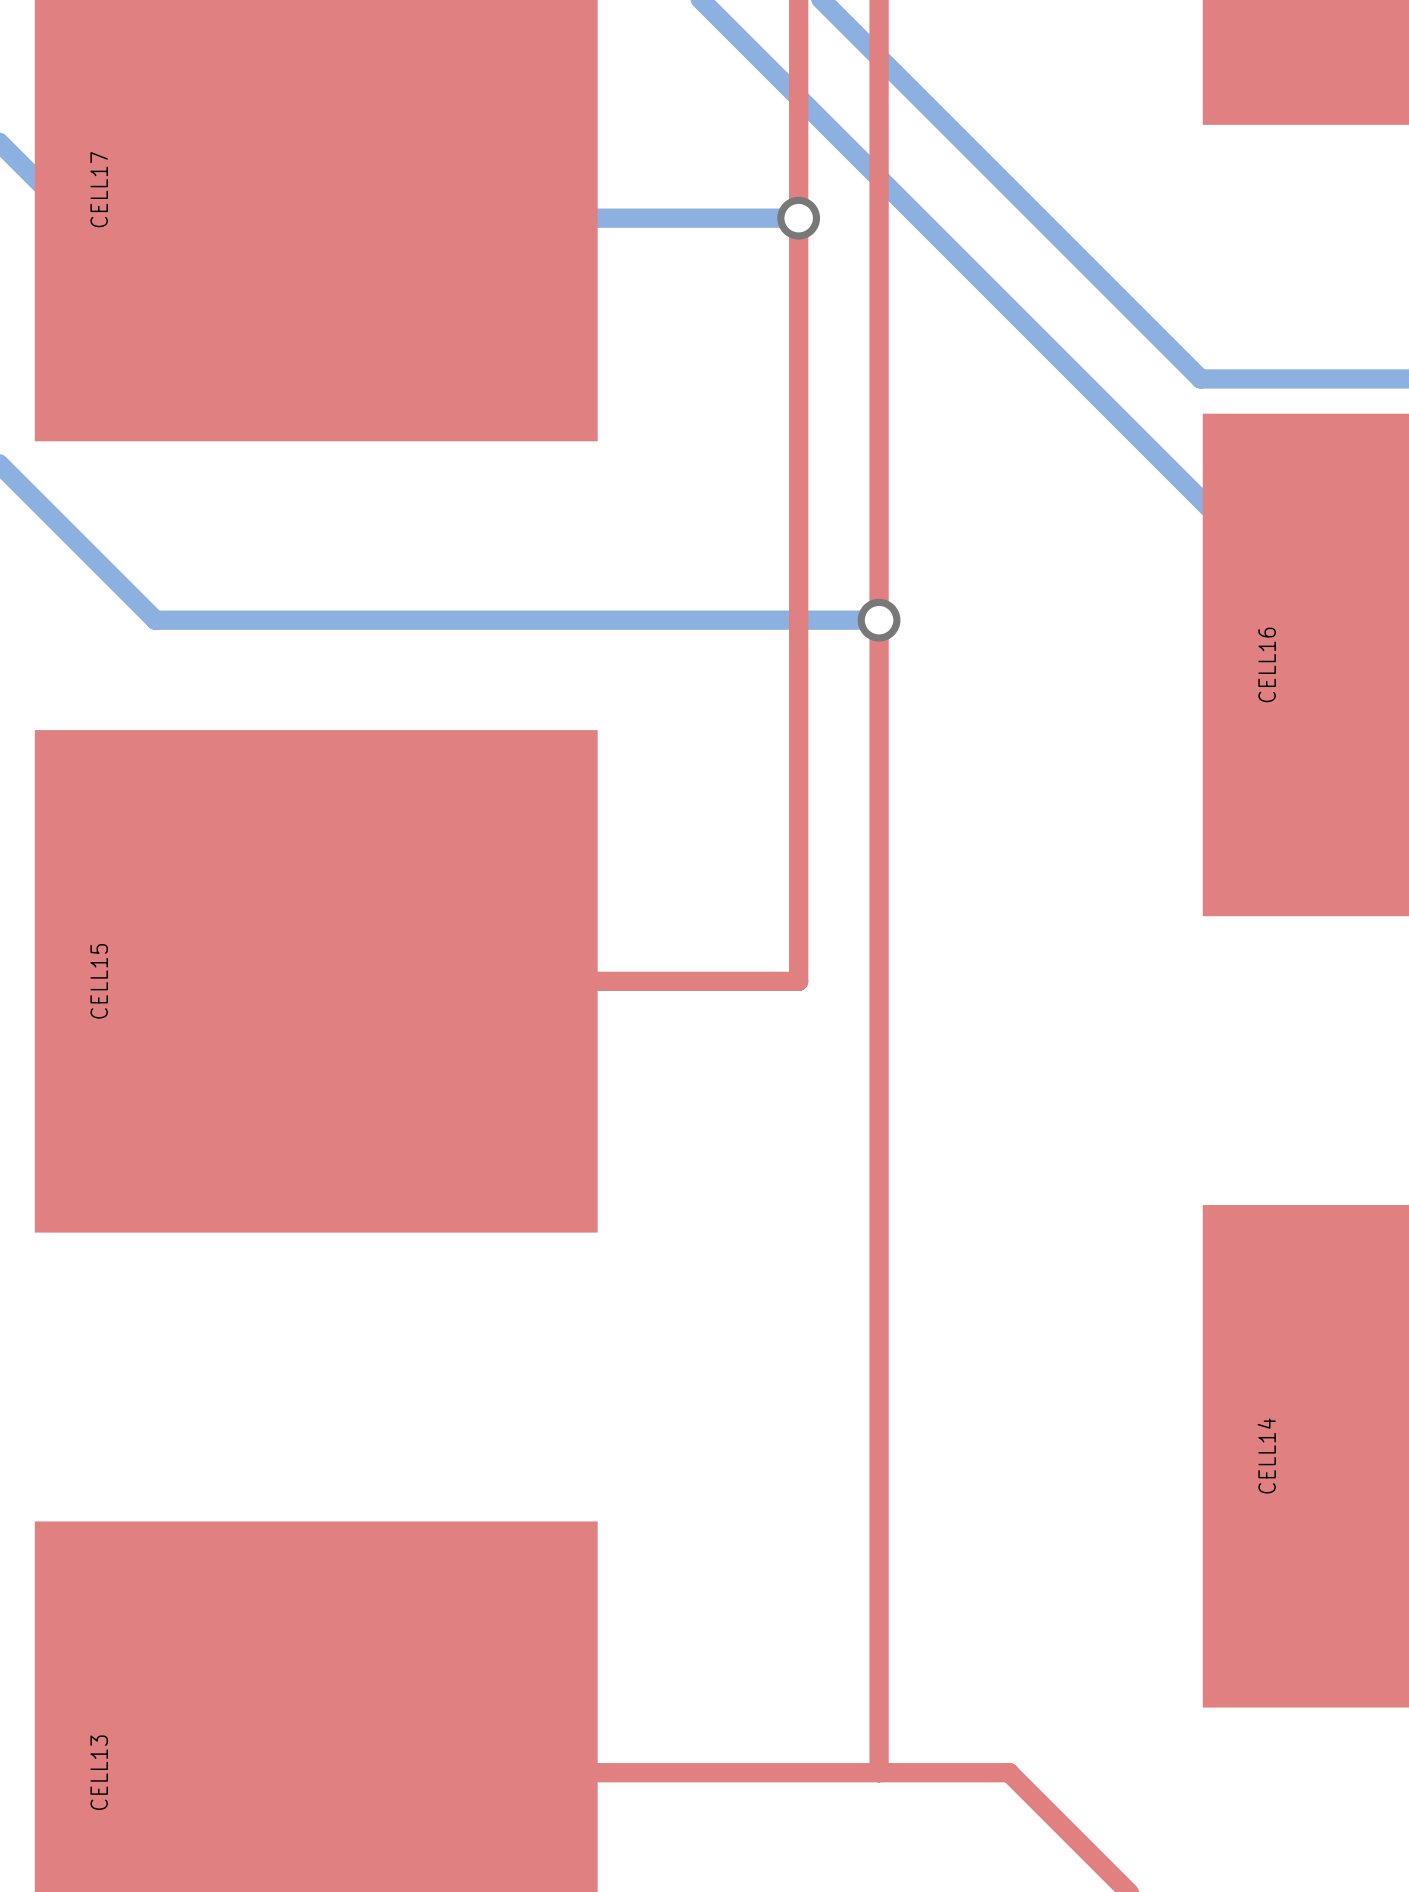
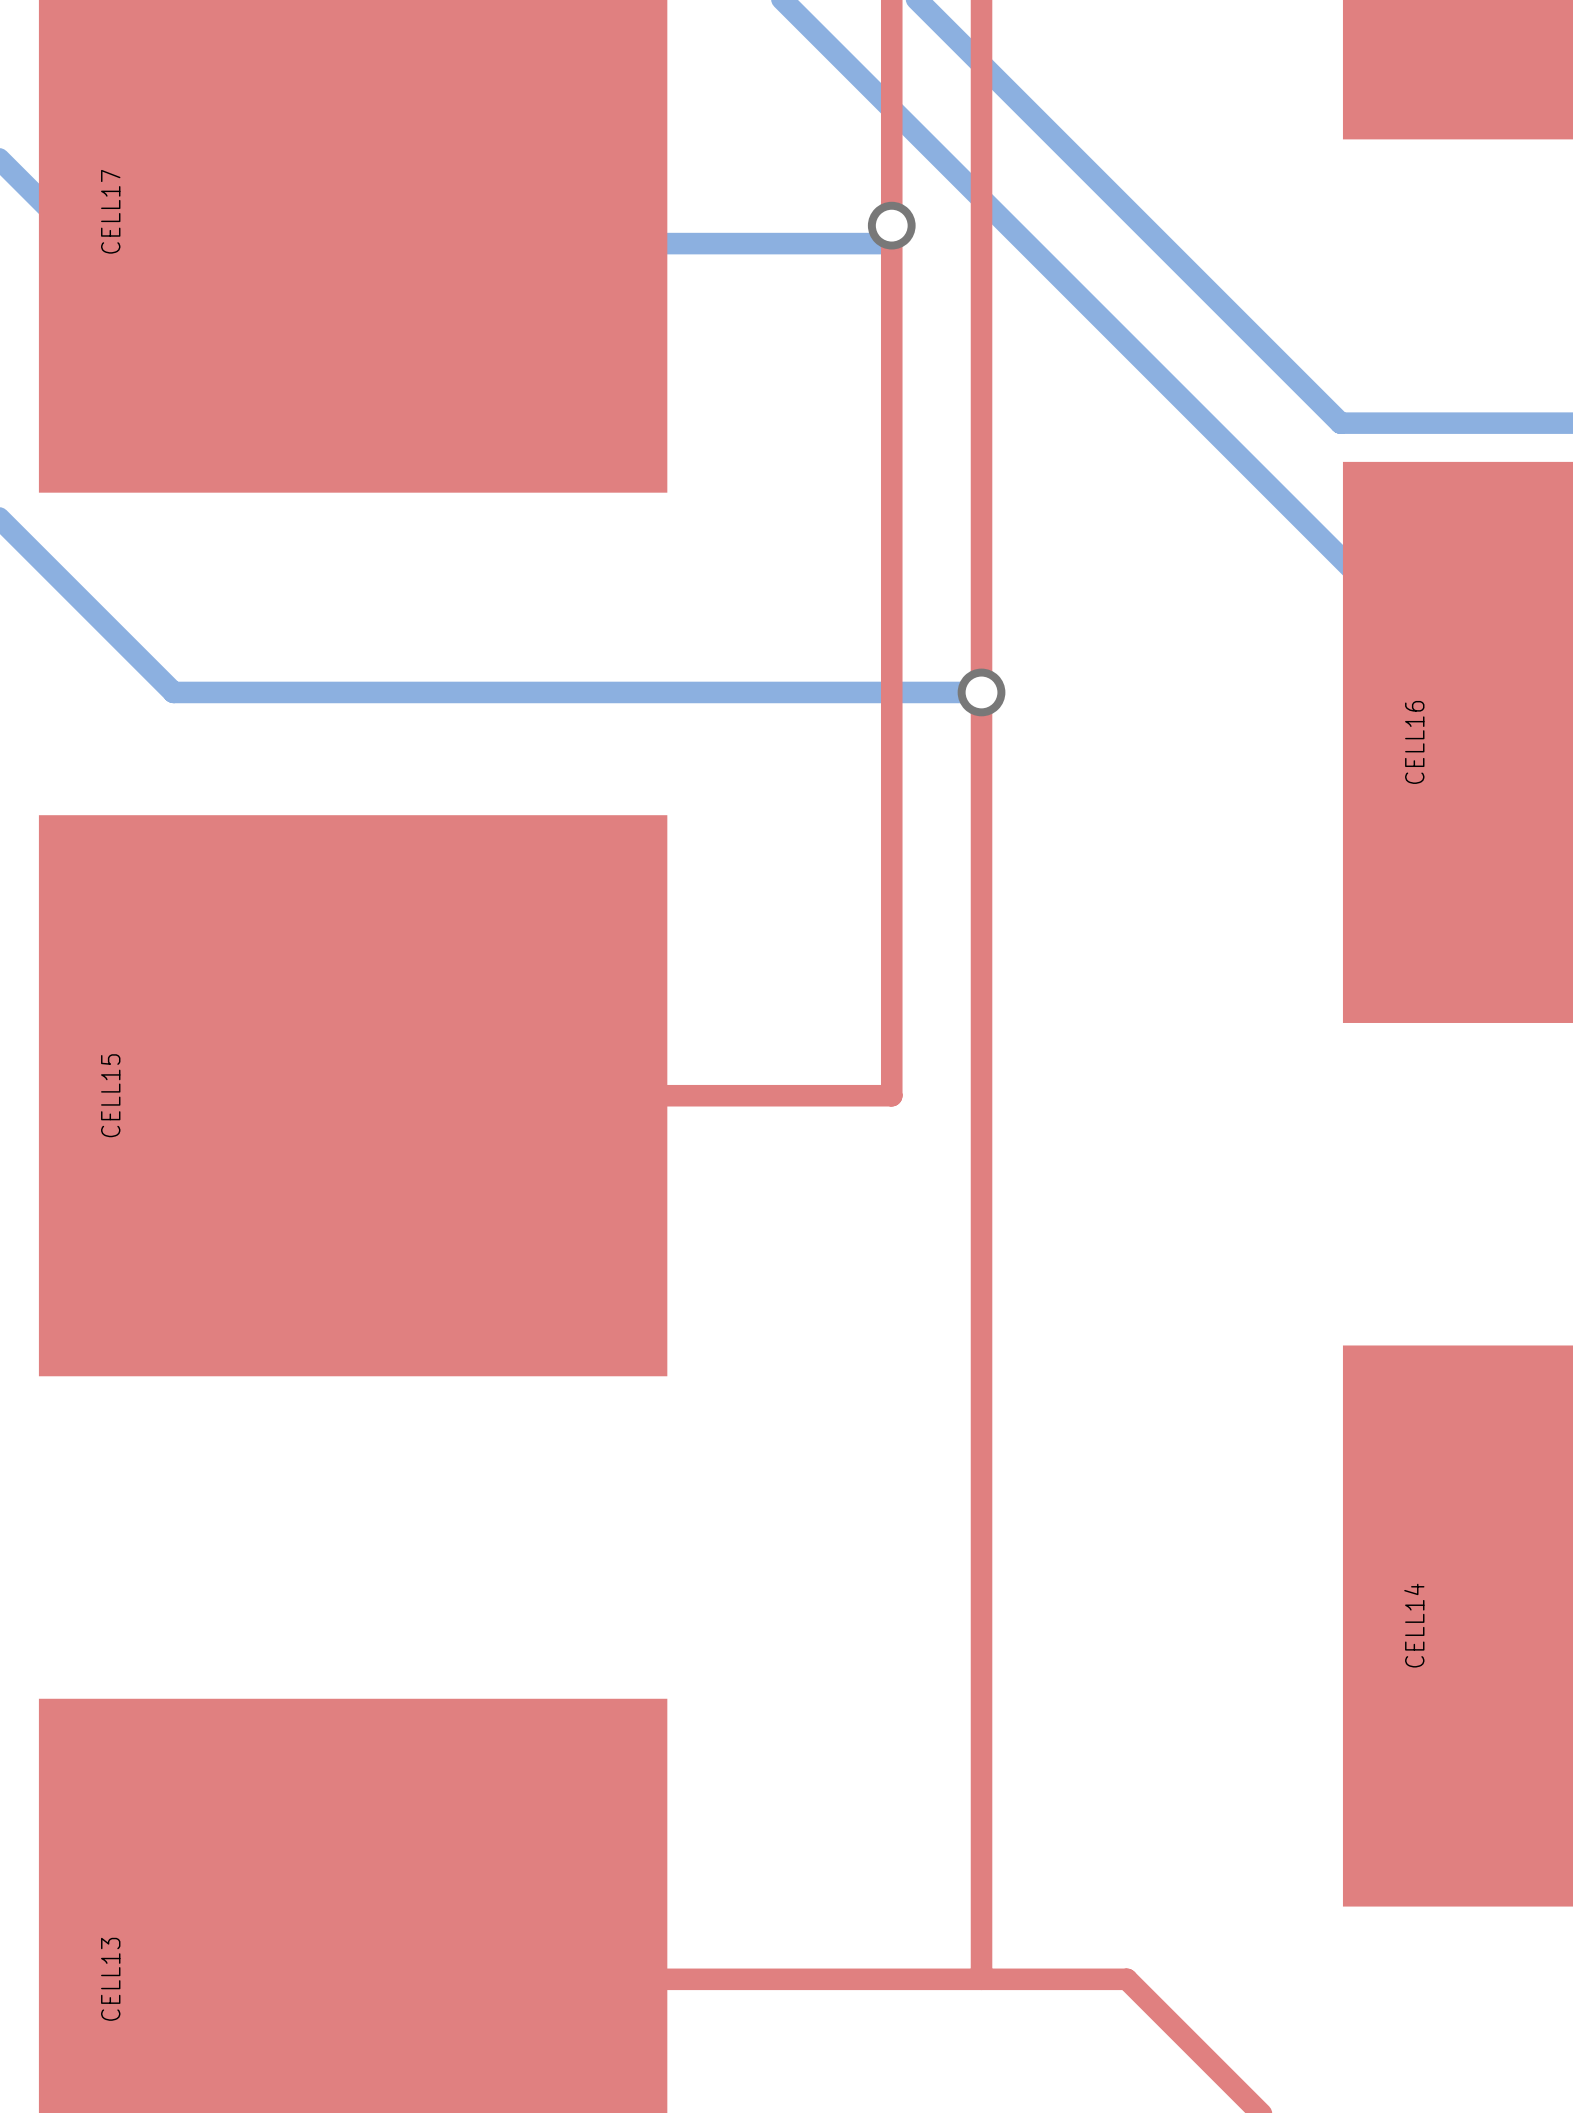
via position: (798, 218) -> (891, 225)

